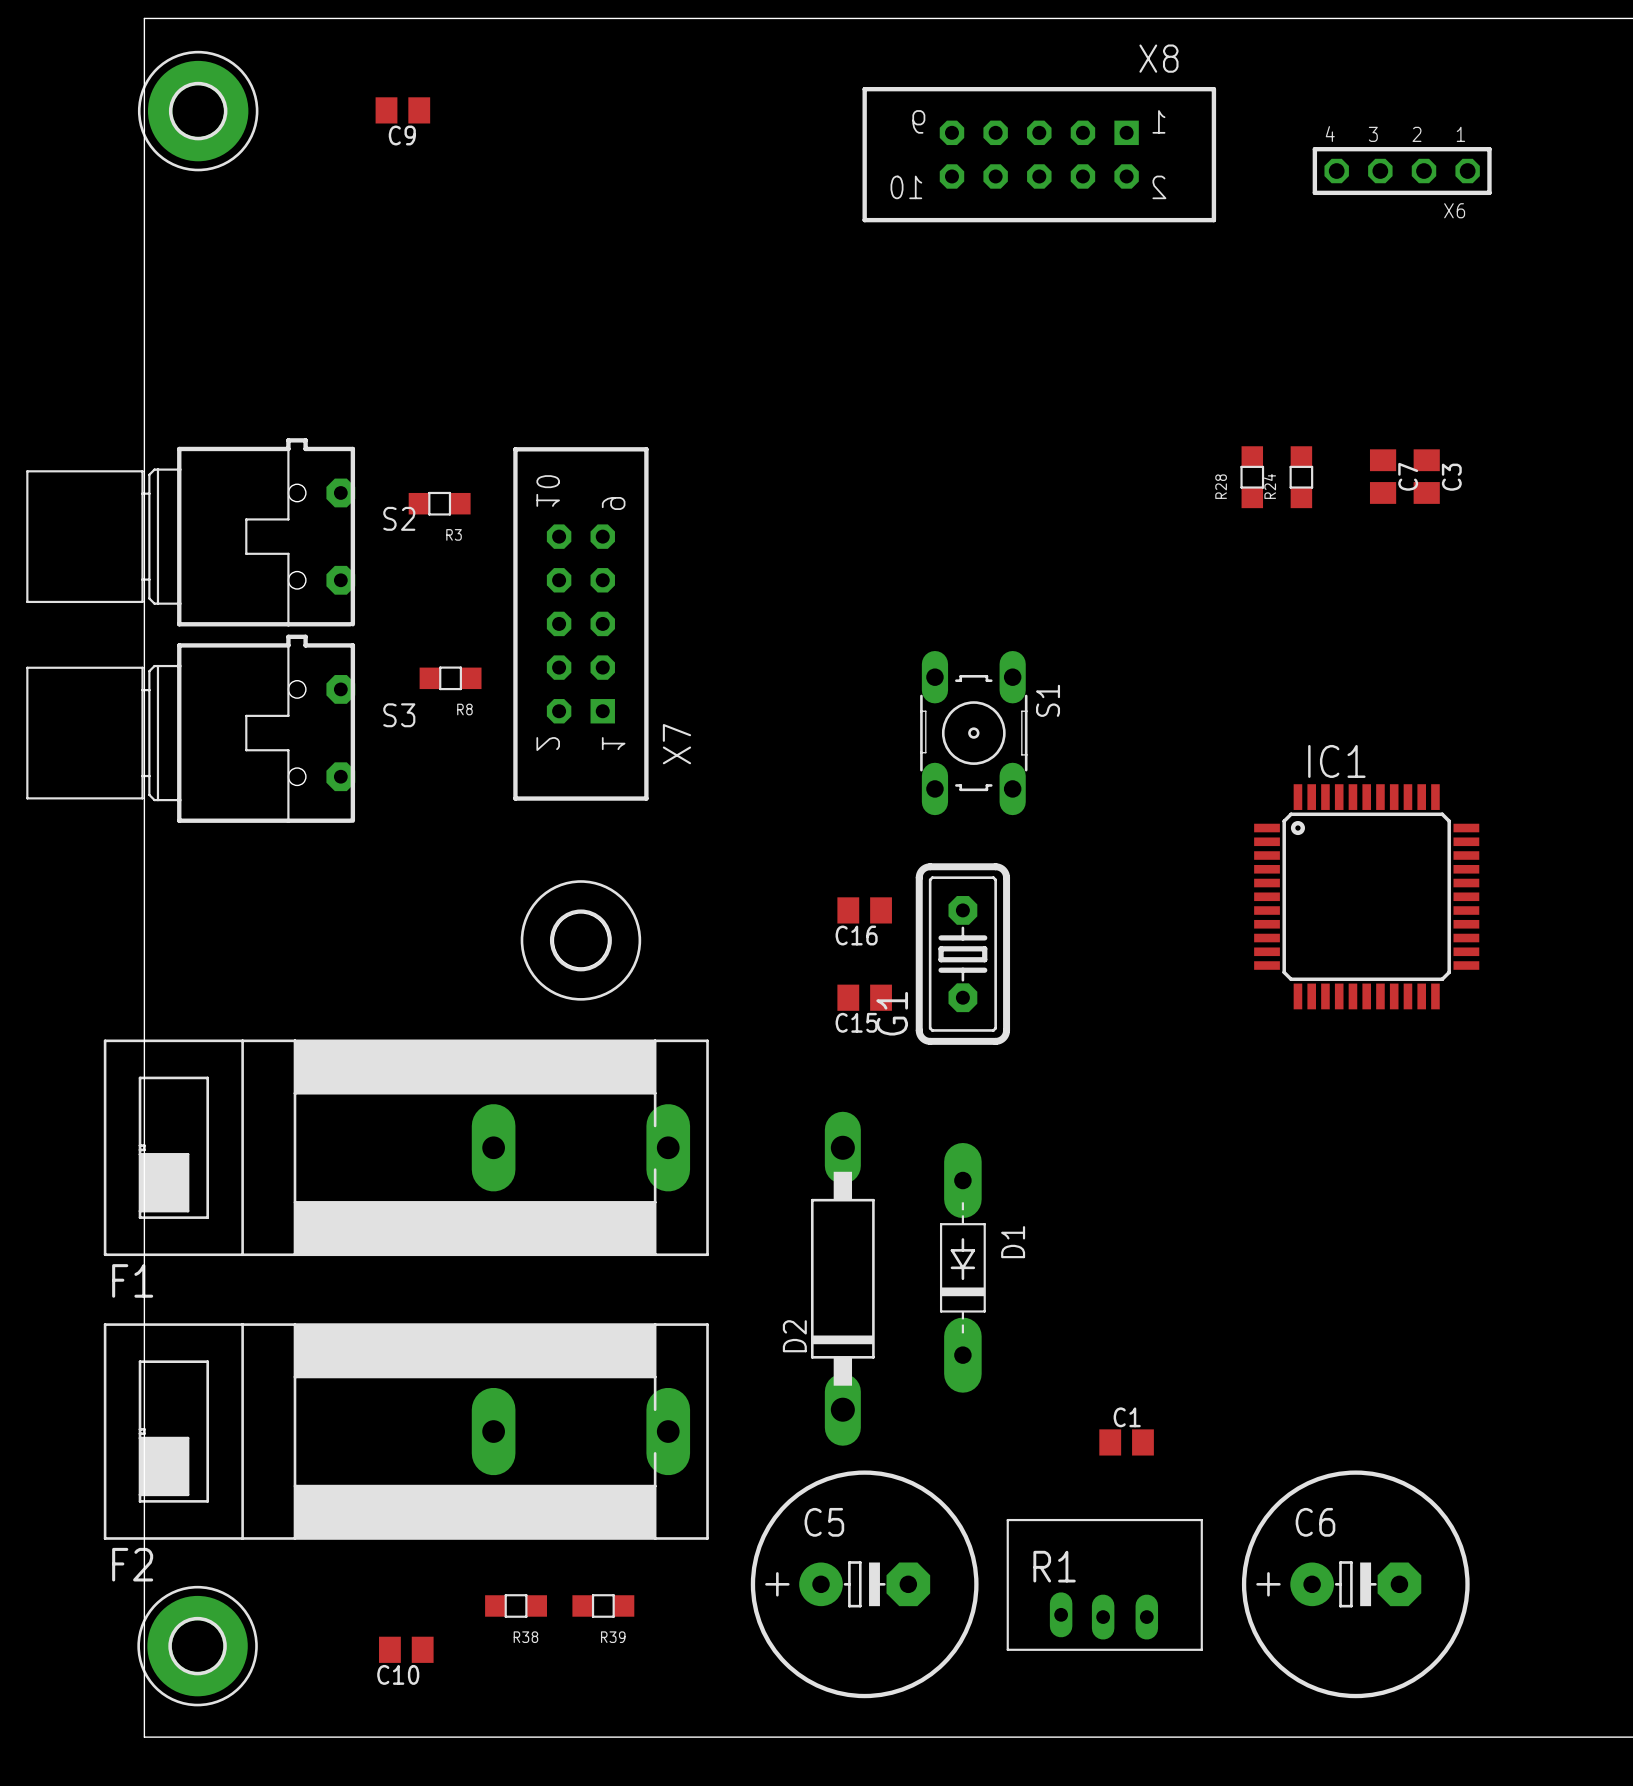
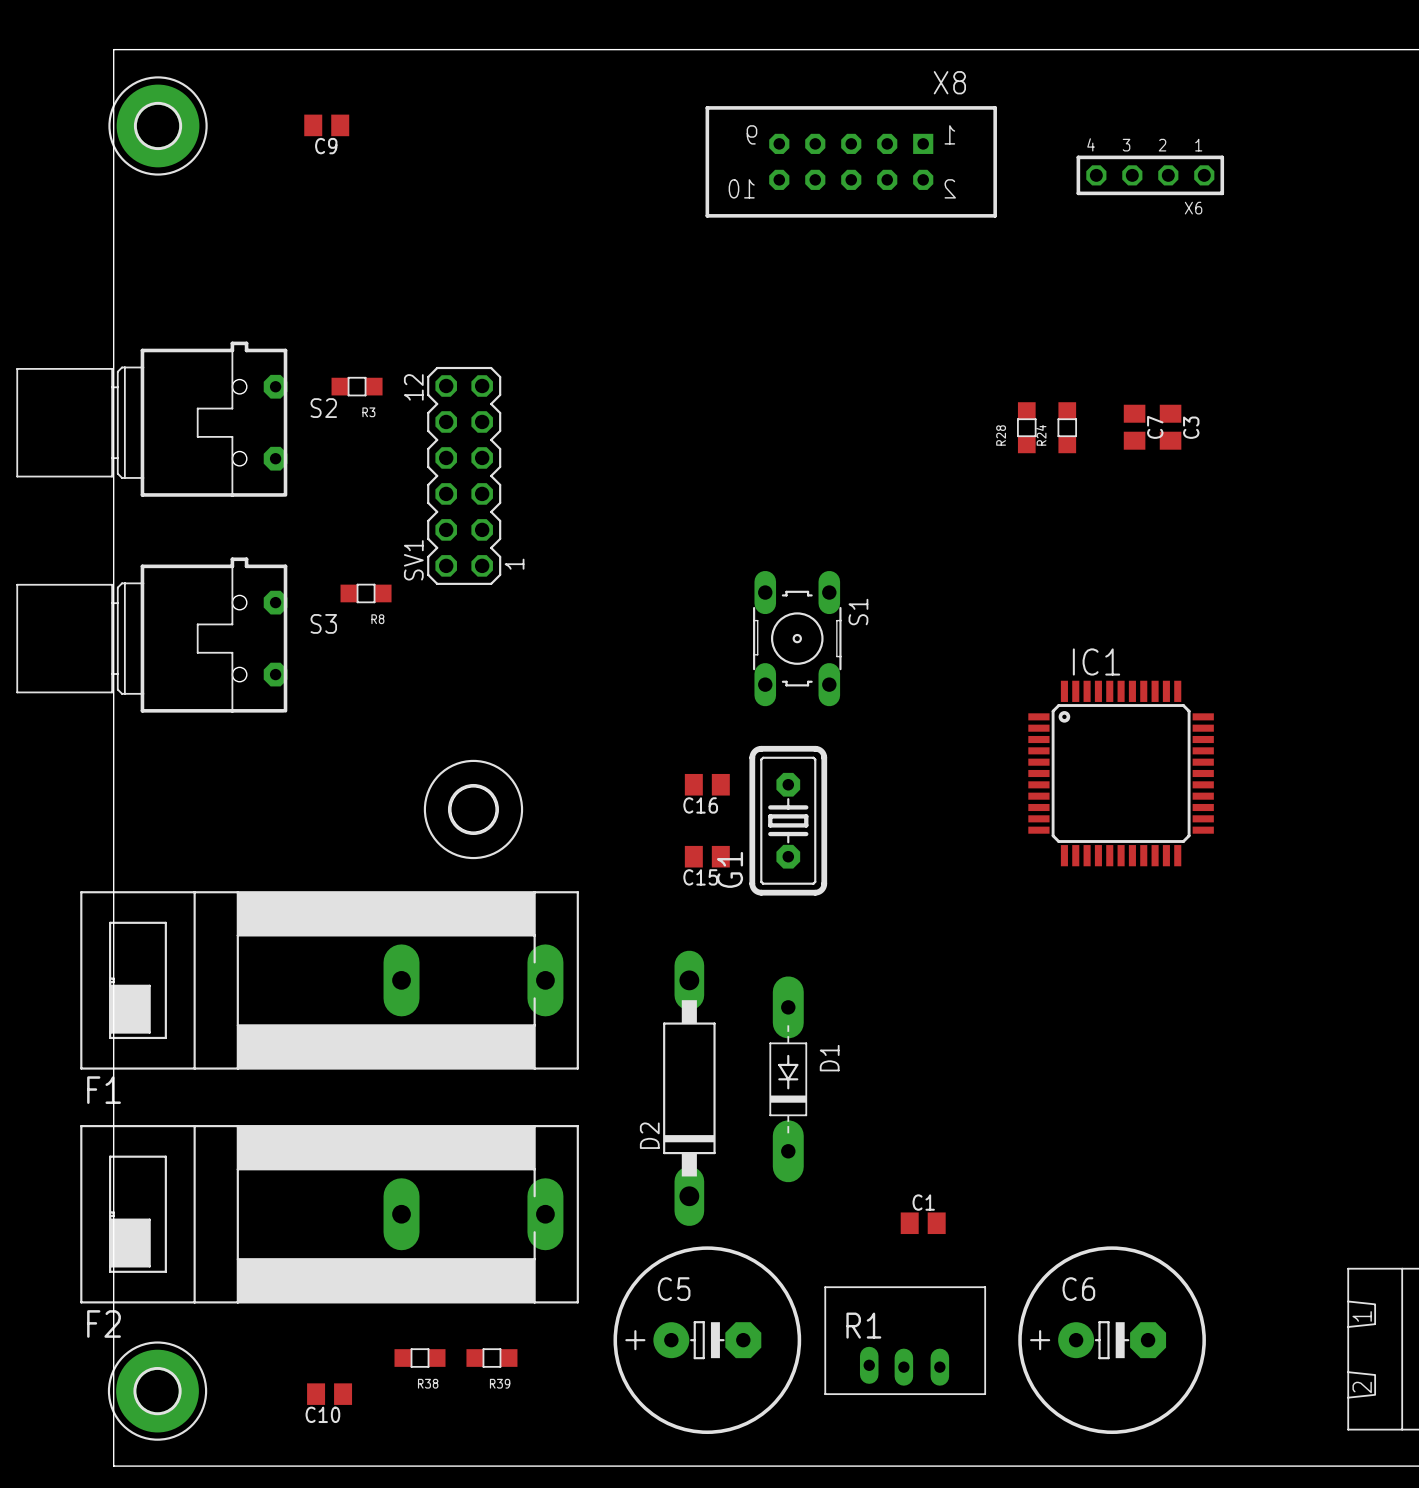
R3 position: (439, 503) -> (357, 386)
S2 position: (190, 532) -> (151, 419)
SV1: none -> (464, 475)
X7: (580, 623) -> none

